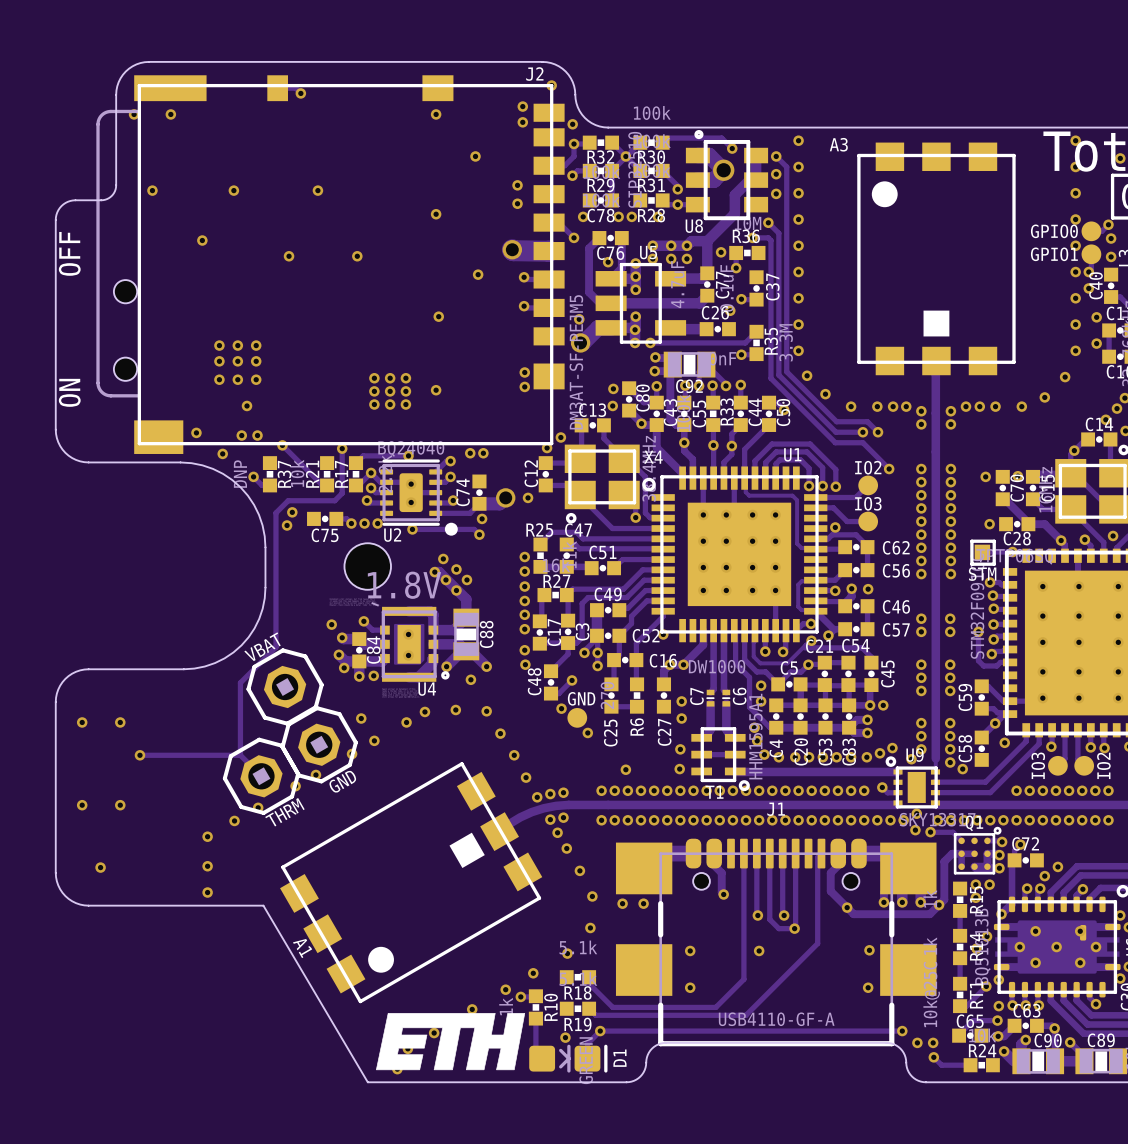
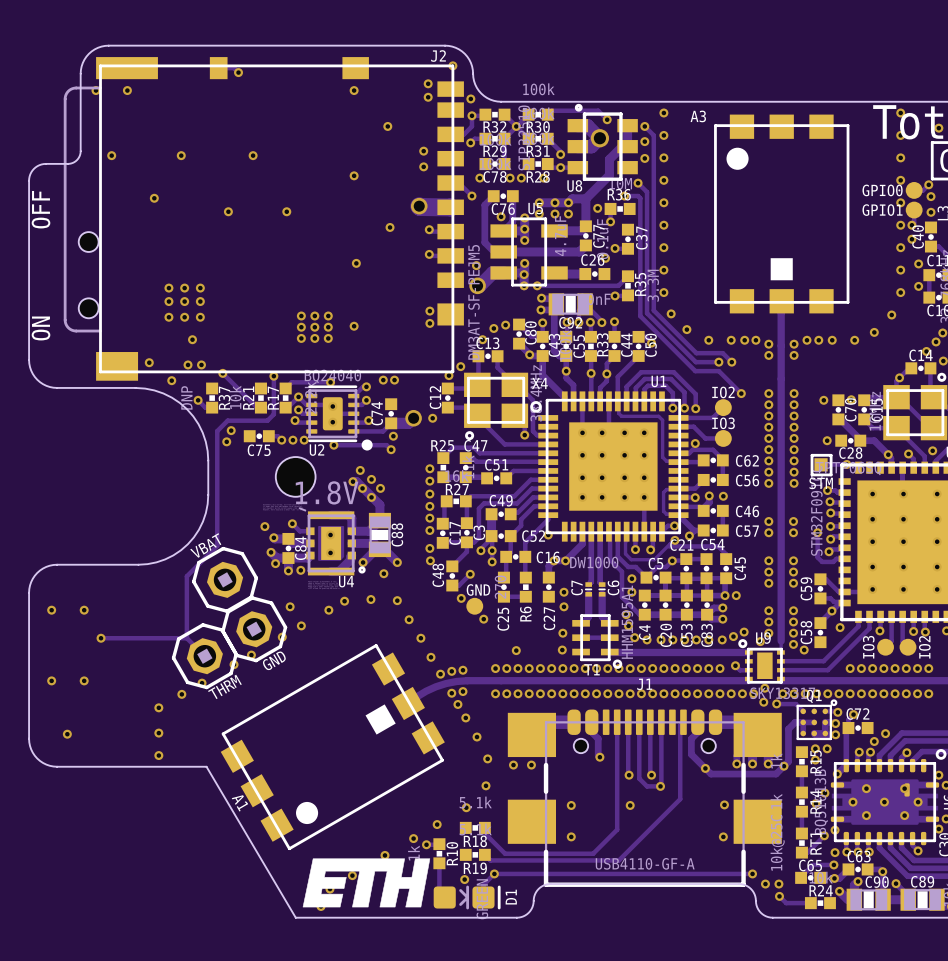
via: none -> (493, 328)
via: none -> (482, 339)
via: (612, 405) -> none

